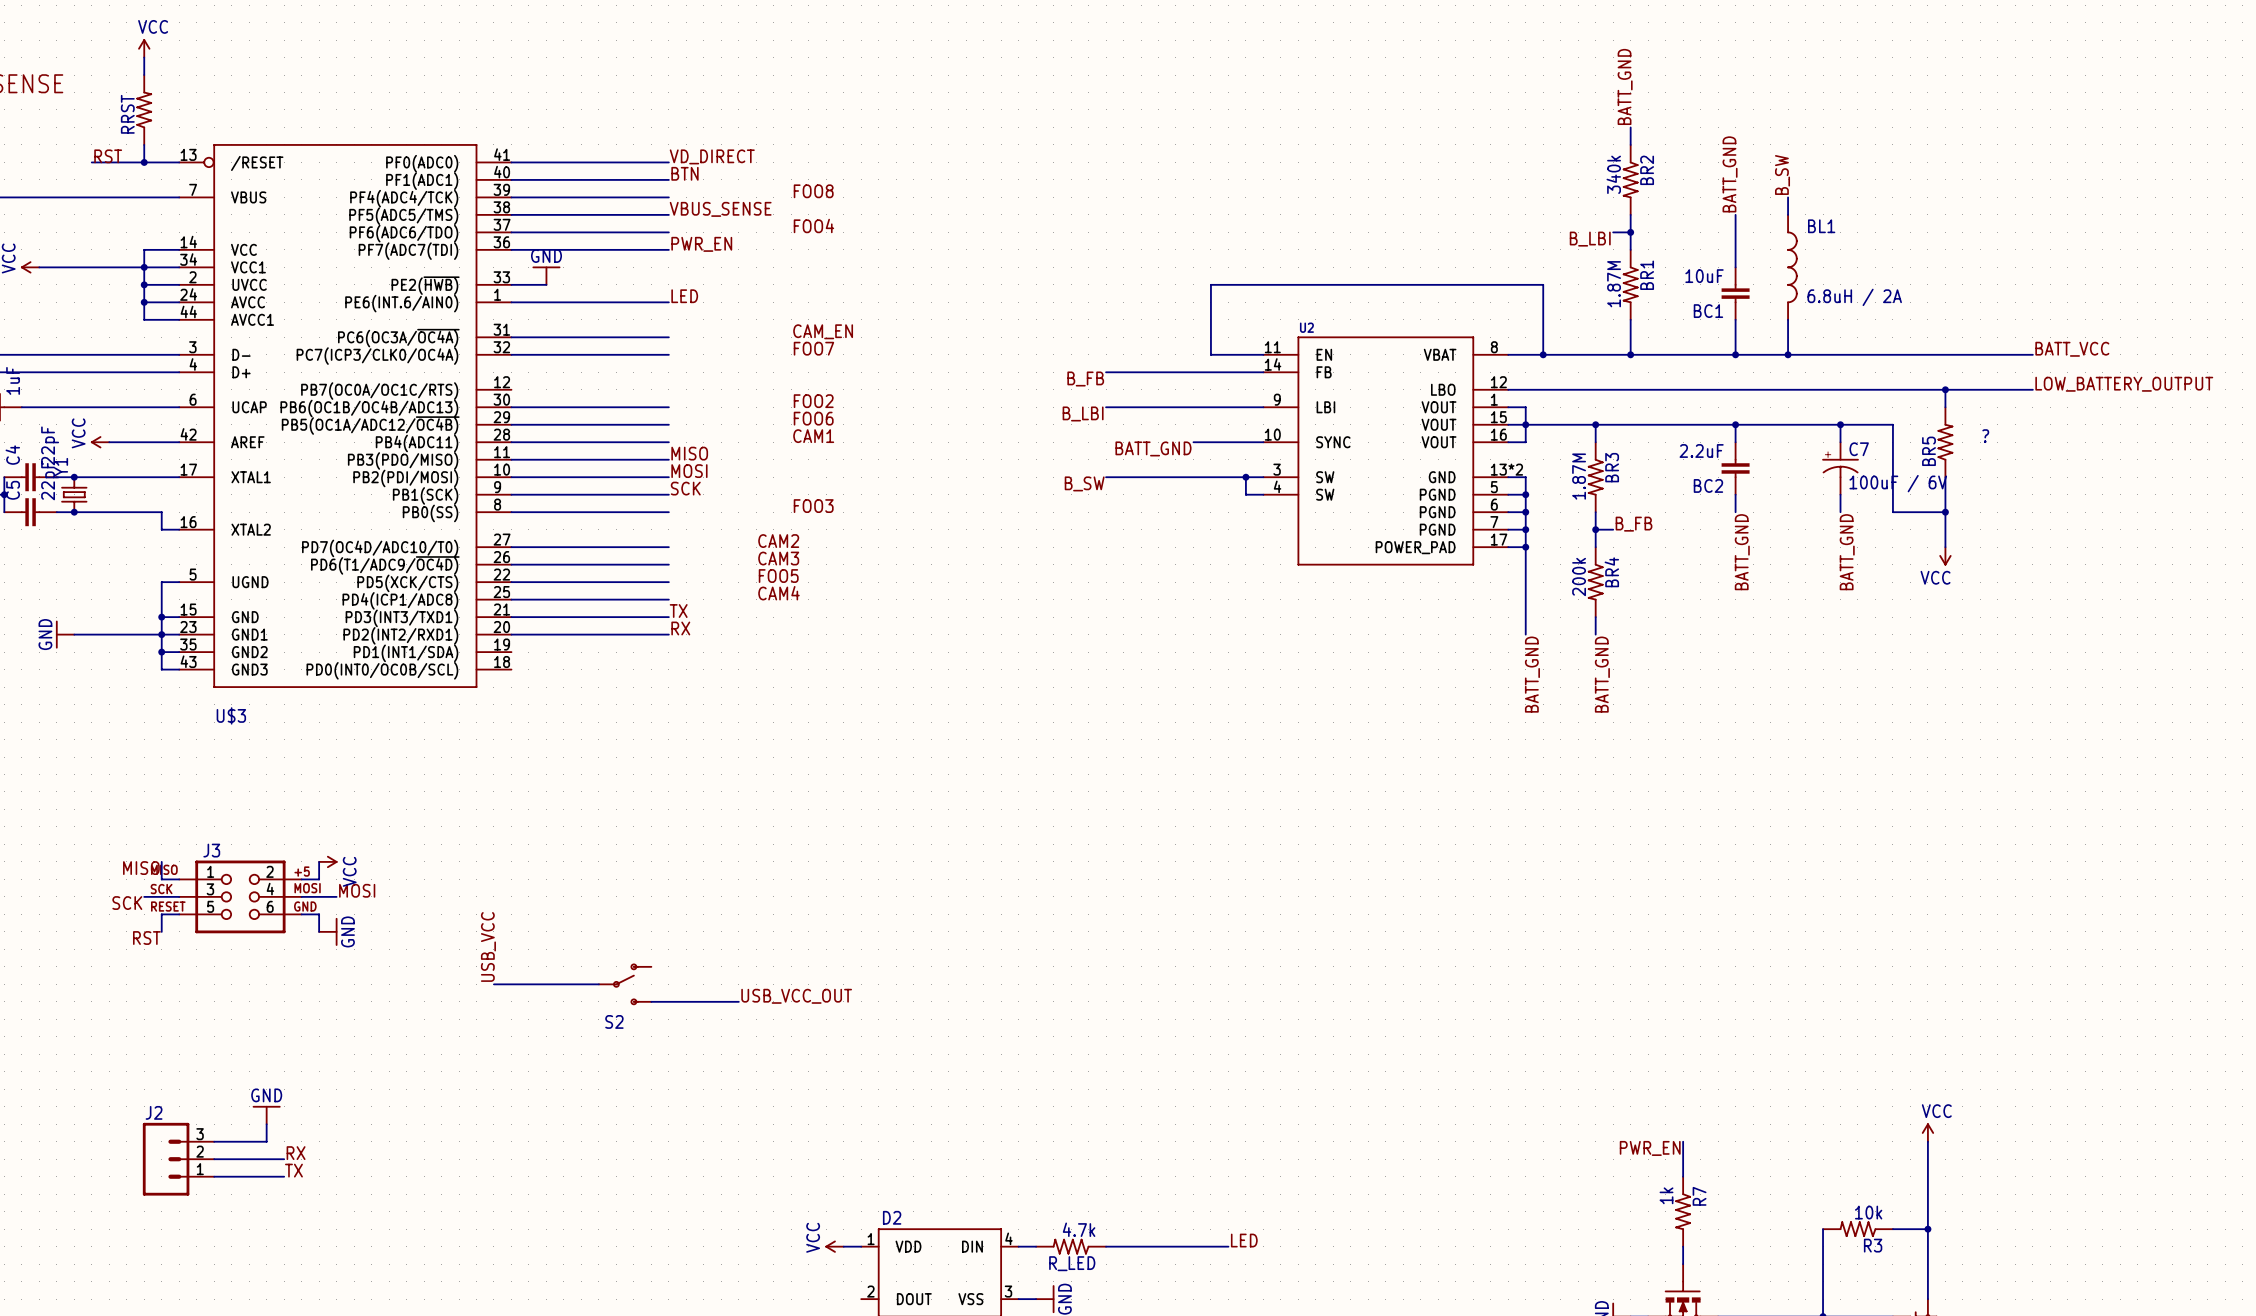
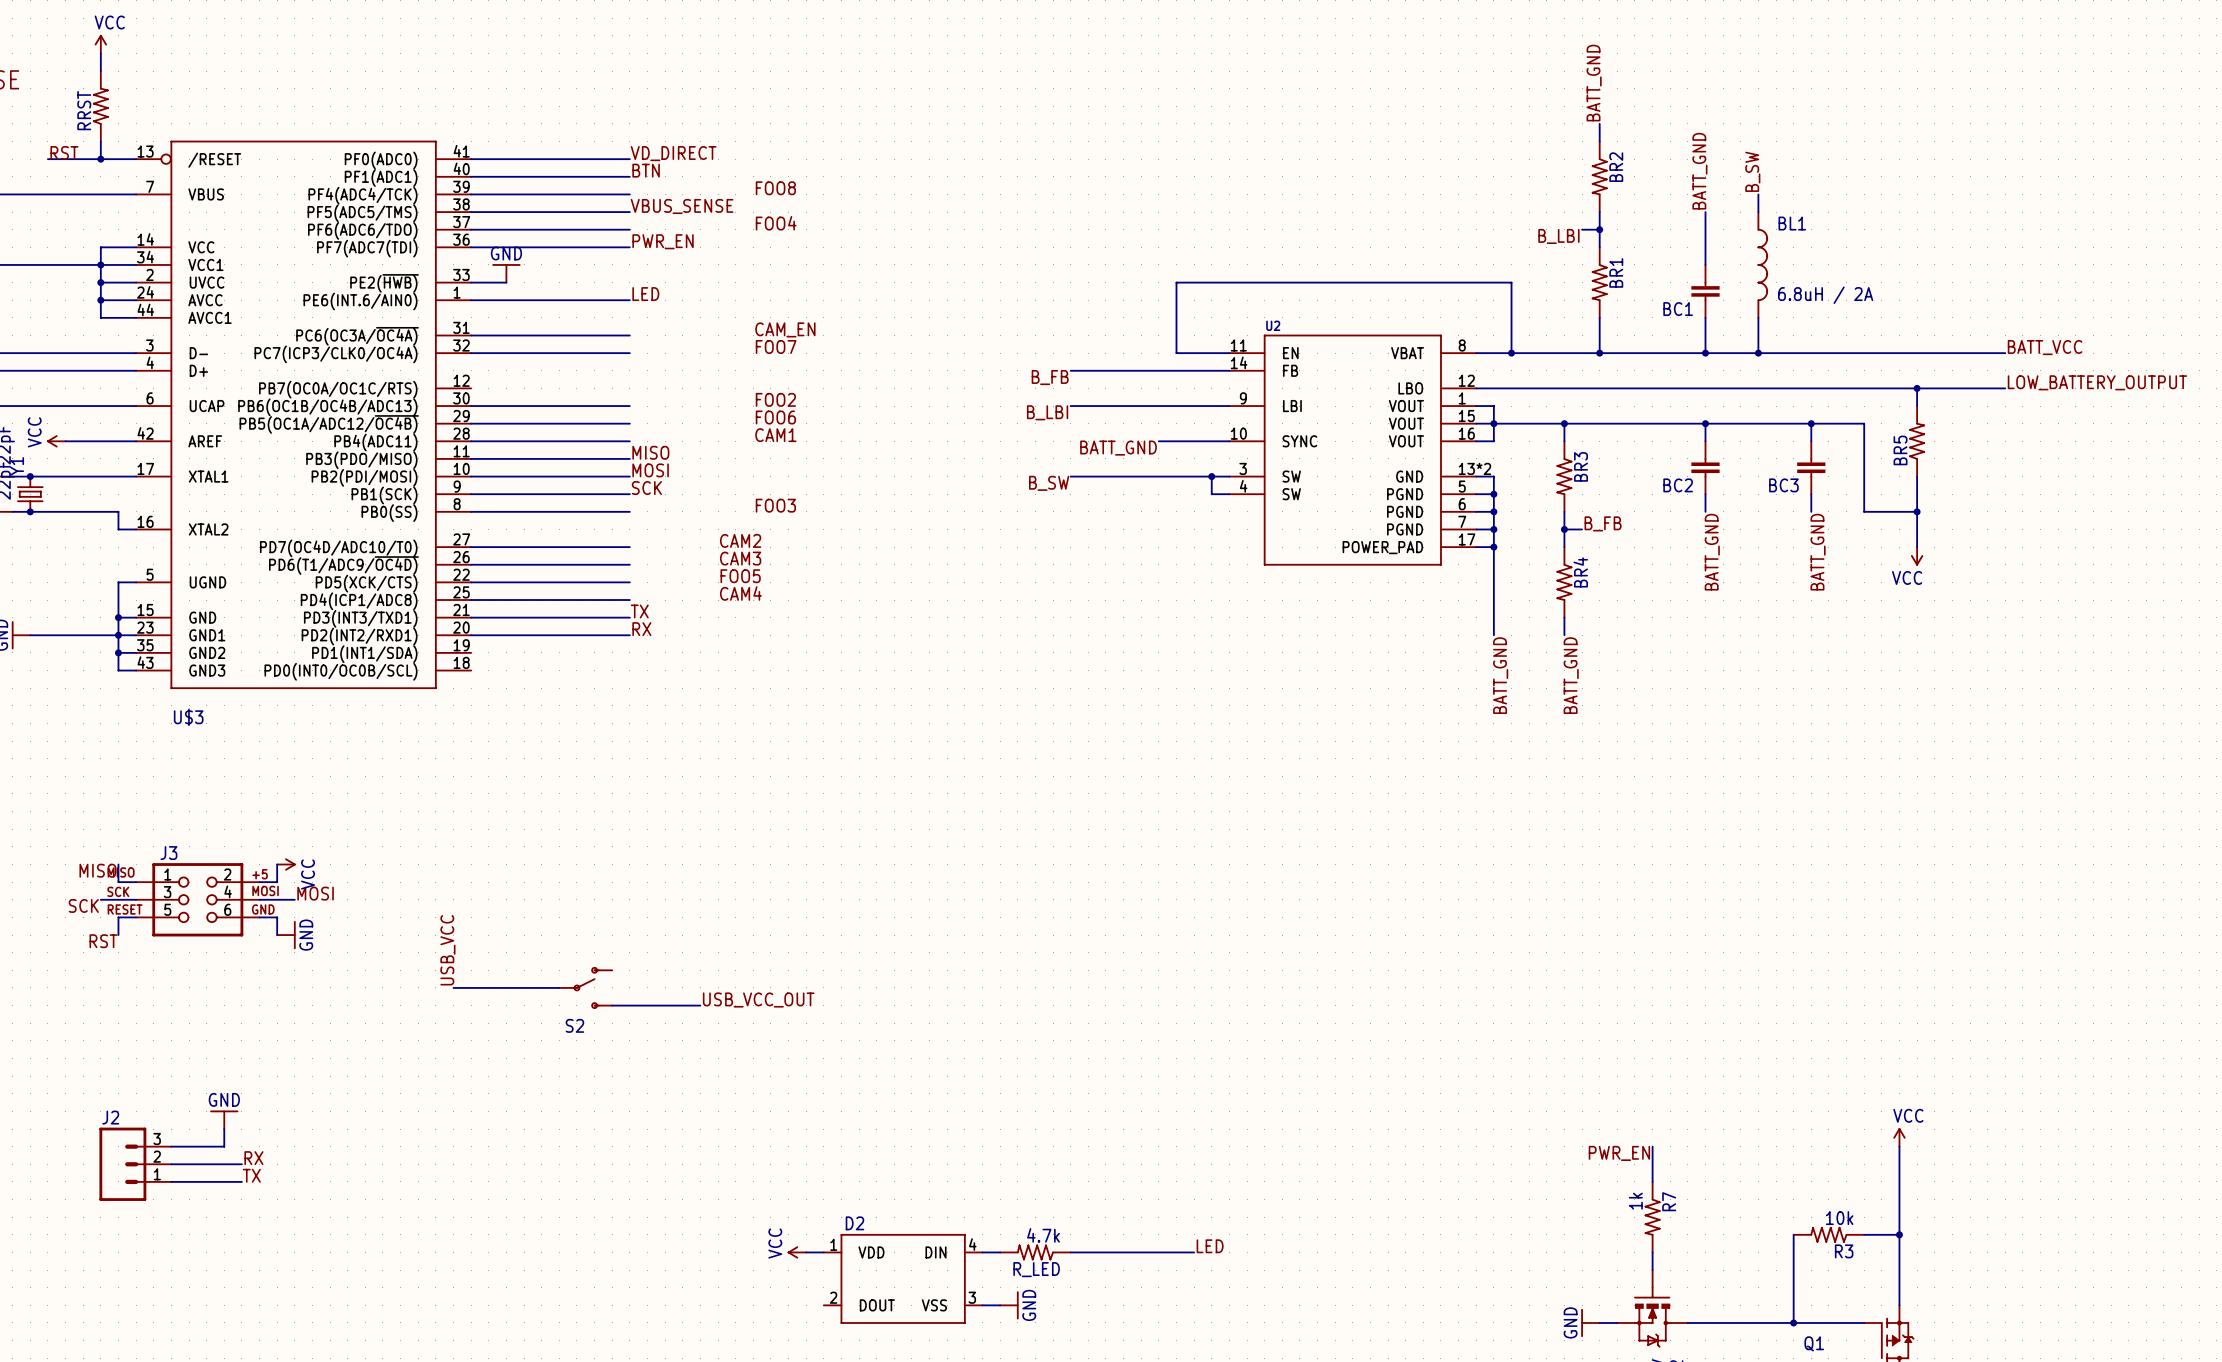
BR2 value: 340k (1613, 174) -> none
BC1 value: 10uF (1704, 276) -> none
BR1 value: 1.87M (1614, 284) -> none
text: ? (1985, 436) -> none
BC2 value: 2.2uF (1701, 450) -> none
C7: 100uF / 6V (1840, 468) -> none
BC3: none -> (1811, 467)
BR3 value: 1.87M (1579, 476) -> none
BR4 value: 200k (1579, 577) -> none

